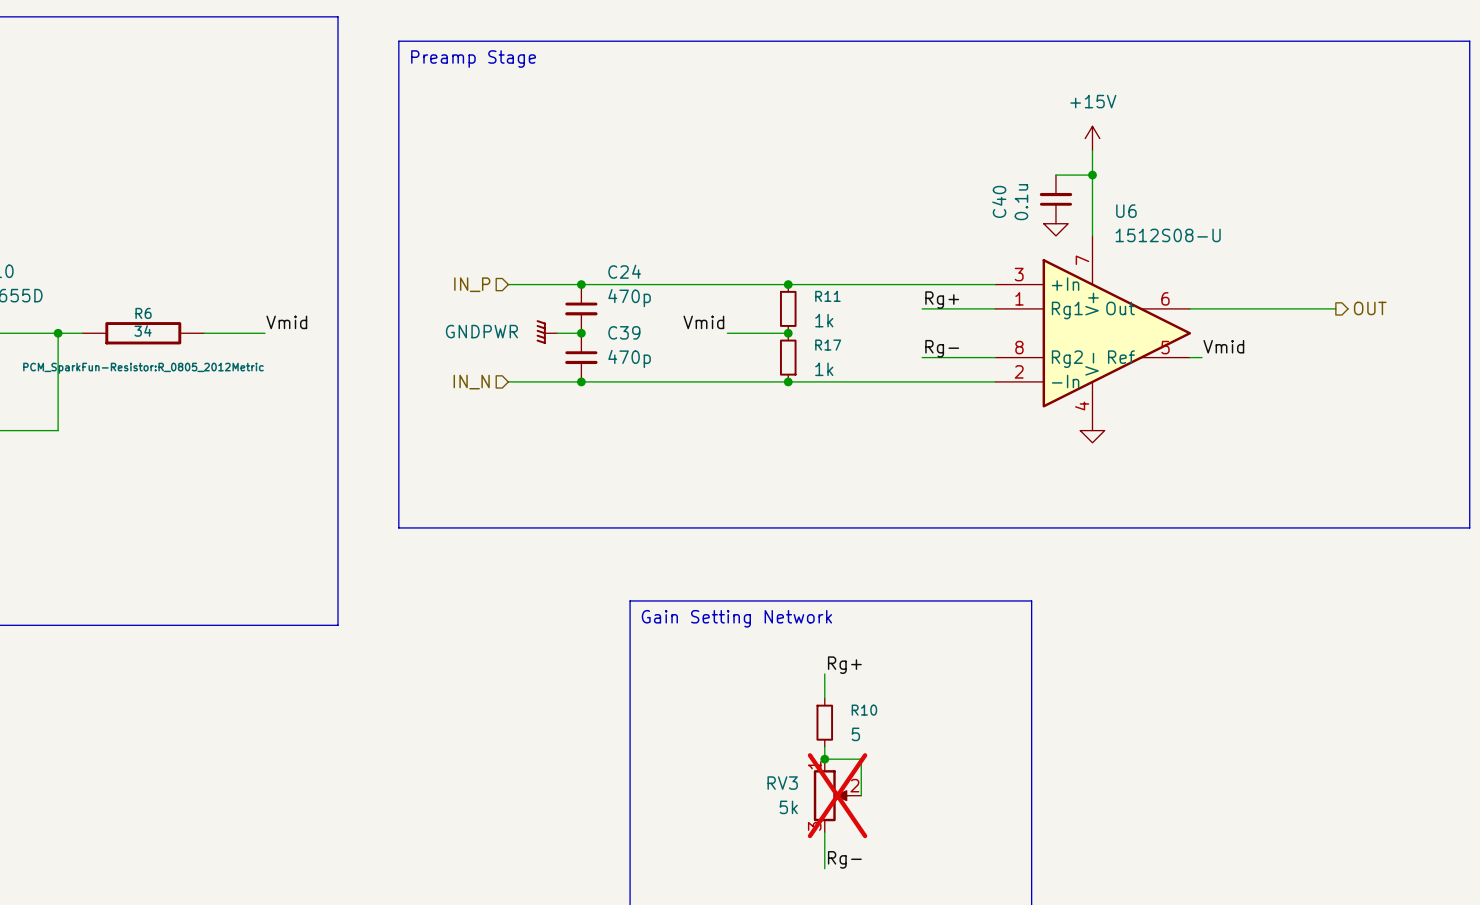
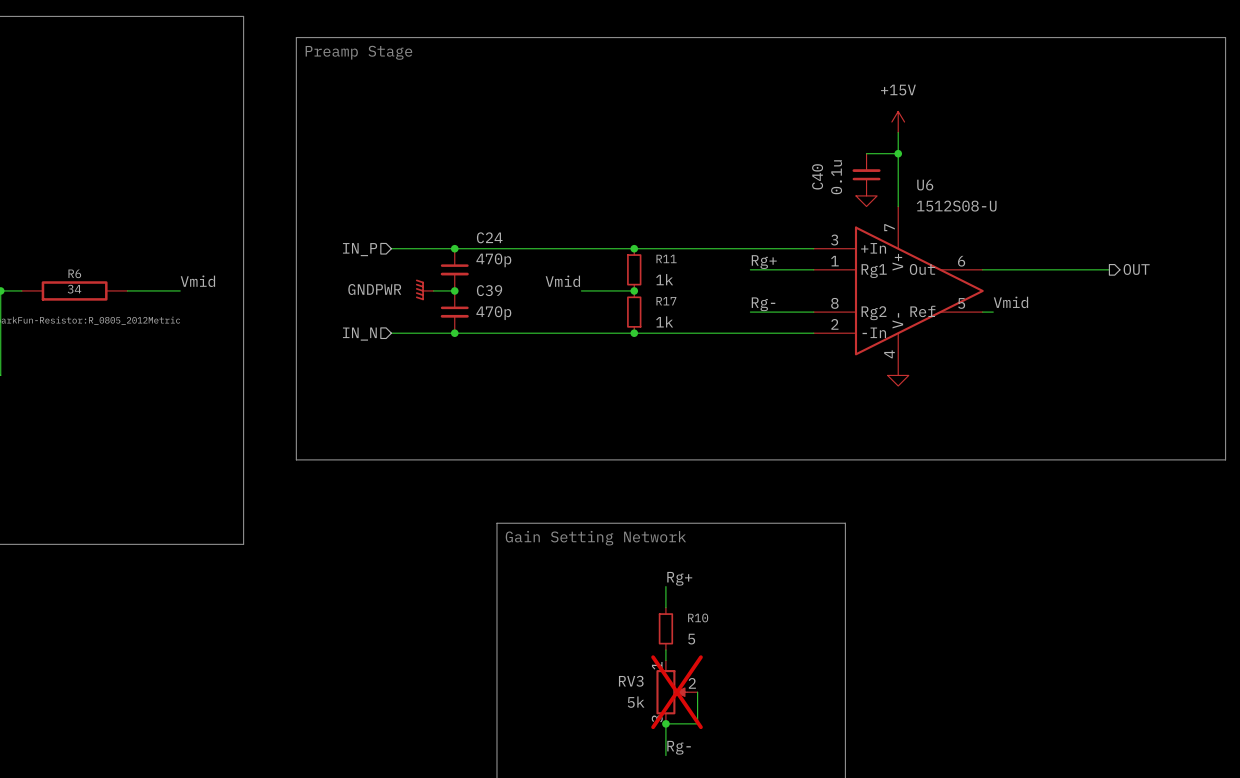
wire: (824, 759) (861, 759) (861, 795) -> (665, 723) (697, 723) (697, 692)
junction: (824, 759) -> none
junction: none -> (665, 723)

